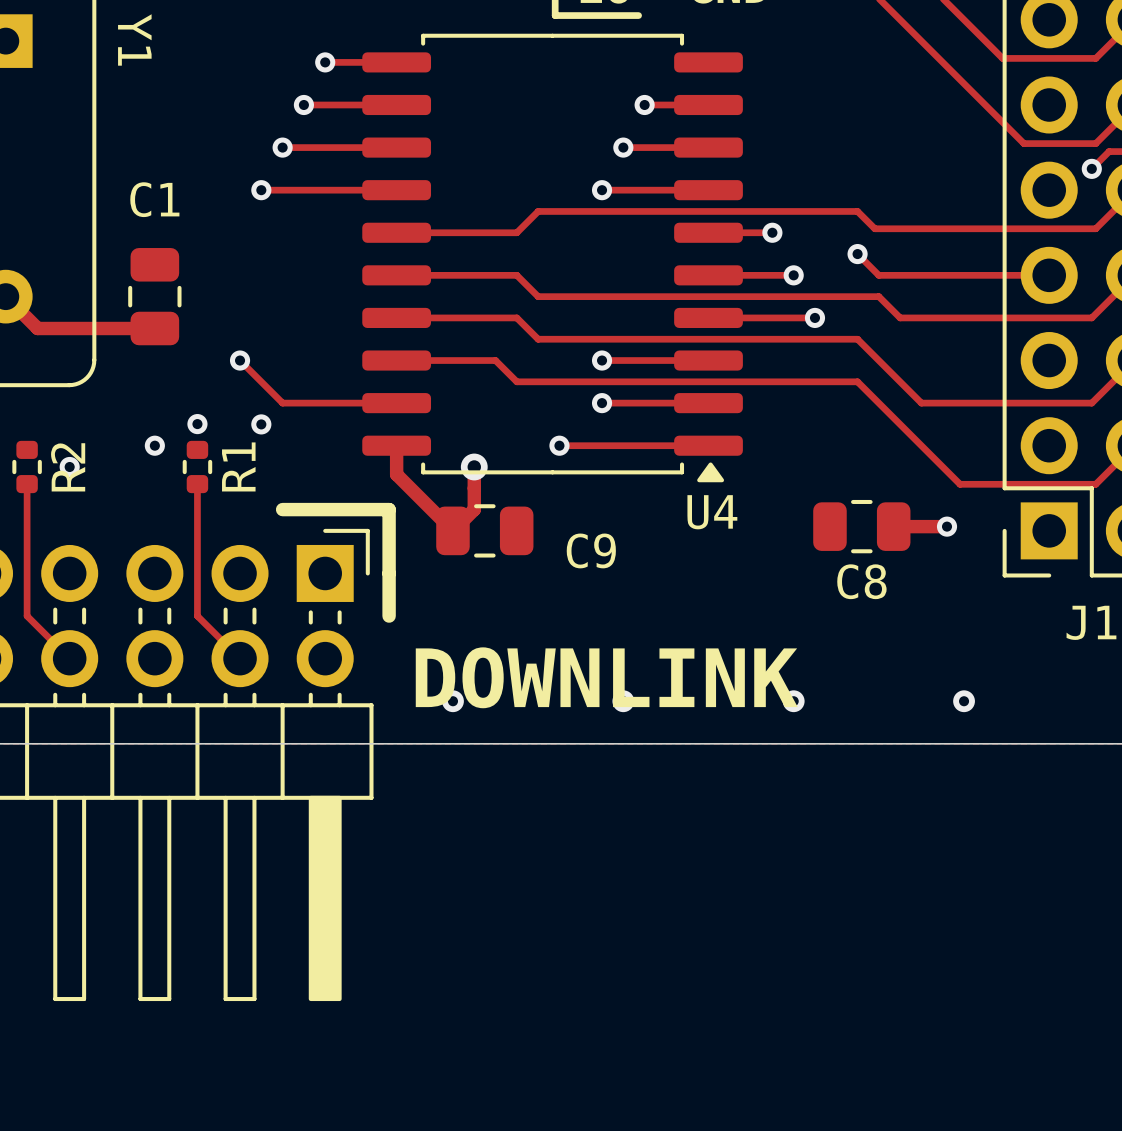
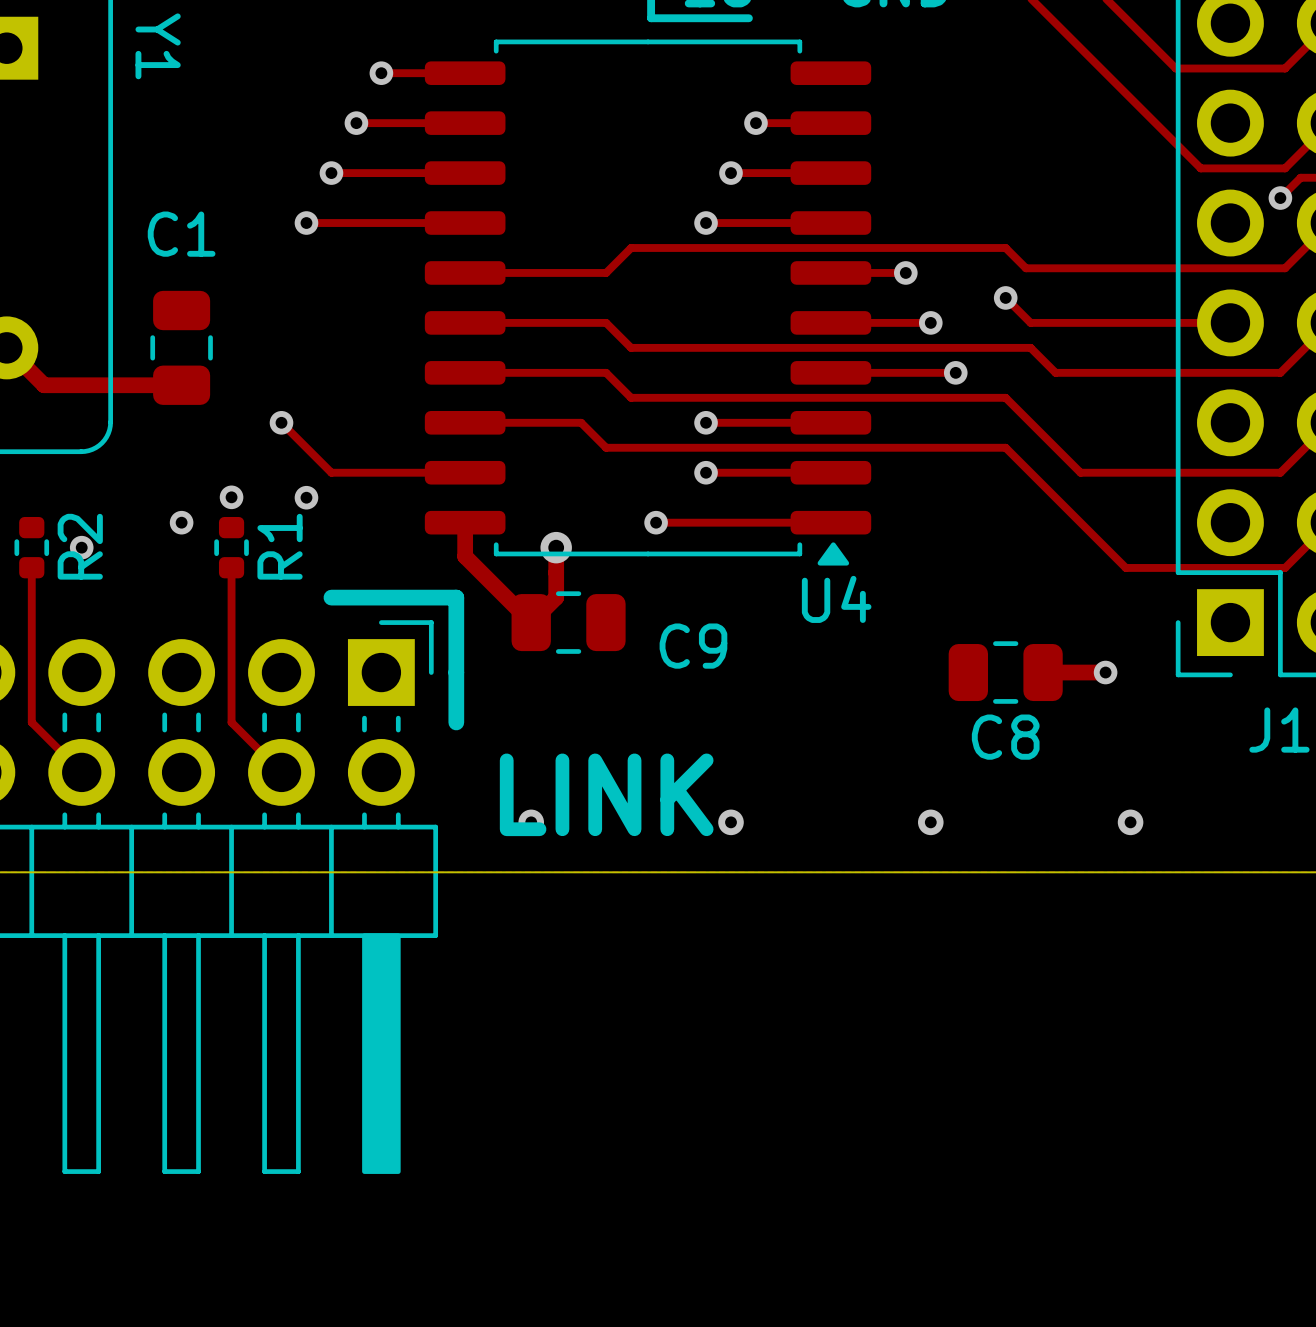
C8 position: (861, 526) -> (1005, 672)
track: (893, 526) (947, 526) -> (1043, 672) (1105, 672)
via position: (947, 526) -> (1105, 672)
text: DOWNLINK (606, 677) -> LINK (606, 794)

